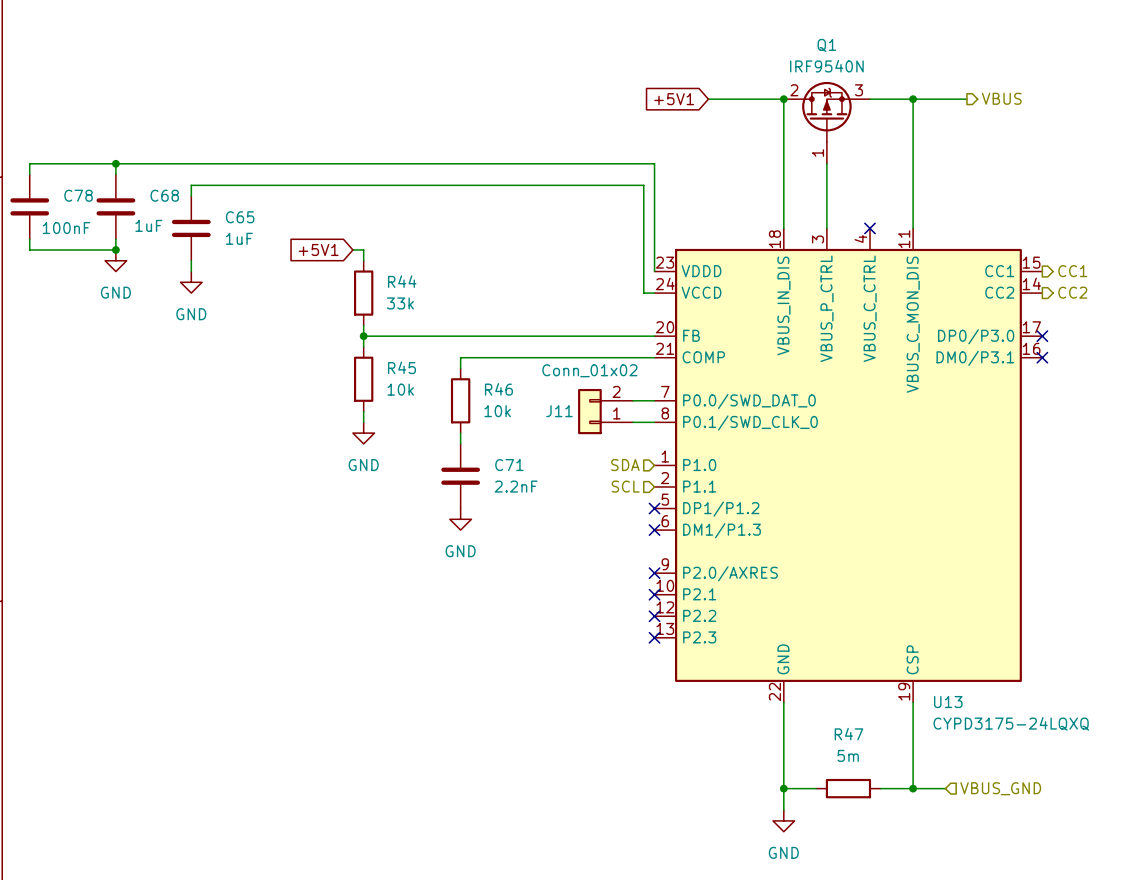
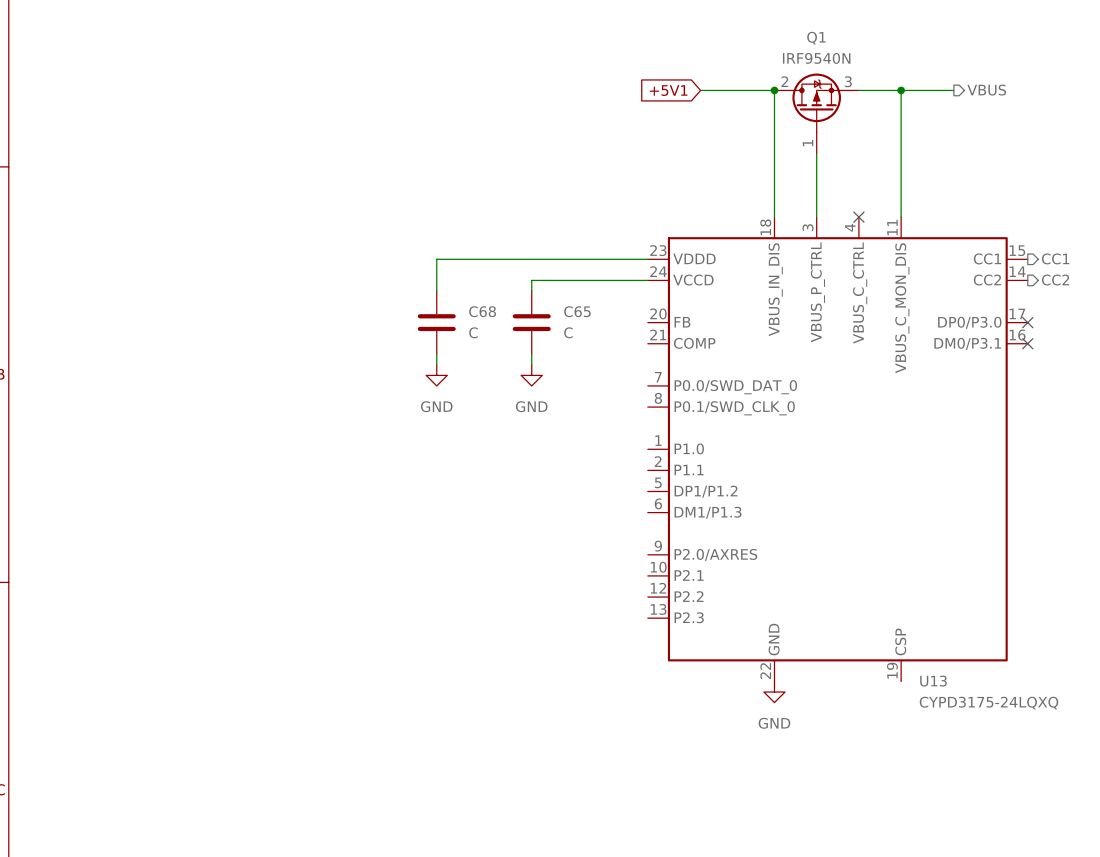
wire: (115, 163) (115, 174) -> none
junction: (115, 163) -> none
wire: (29, 174) (29, 163) (654, 163) (654, 271) -> (436, 290) (436, 259) (647, 259)
wire: (191, 196) (191, 185) (643, 185) (643, 293) -> (531, 290) (531, 280) (637, 280)
C78: 100nF (29, 206) -> none
C68 position: (115, 206) -> (436, 322)
C68 value: 1uF (148, 225) -> C (473, 332)
C65 position: (191, 228) -> (531, 322)
C65 value: 1uF (239, 238) -> C (568, 332)
wire: (29, 239) (29, 249) (115, 249) (115, 239) -> none
junction: (115, 249) -> none
global label: +5V1 (318, 249) -> none
wire: (352, 249) (363, 249) (363, 260) -> none
power symbol: GND (115, 260) -> none
wire: (191, 260) (191, 271) -> none
power symbol: GND (191, 282) -> none
R44: 33k (363, 293) -> none
wire: (363, 325) (363, 346) -> none
wire: (363, 336) (654, 336) -> none
junction: (363, 336) -> none
wire: (654, 357) (460, 357) (460, 368) -> none
R45: 10k (363, 379) -> none
power symbol: none -> GND (436, 375)
power symbol: none -> GND (531, 375)
R46: 10k (460, 400) -> none
wire: (632, 400) (654, 400) -> none
wire: (363, 411) (363, 422) -> (531, 354) (531, 364)
J11: Conn_01x02 (605, 411) -> none
wire: (632, 422) (654, 422) -> none
power symbol: GND (363, 433) -> none
wire: (460, 433) (460, 443) -> (436, 354) (436, 364)
hierarchical label: SDA (625, 465) -> none
C71: 2.2nF (460, 476) -> none
hierarchical label: SCL (625, 486) -> none
no-connect mark: (654, 508) -> none
power symbol: GND (460, 519) -> none
no-connect mark: (654, 530) -> none
no-connect mark: (654, 573) -> none
no-connect mark: (654, 594) -> none
no-connect mark: (654, 616) -> none
no-connect mark: (654, 637) -> none
wire: (783, 702) (783, 810) -> none
wire: (913, 702) (913, 788) -> none
wire: (783, 788) (816, 788) -> none
junction: (783, 788) -> none
R47: 5m (848, 788) -> none
wire: (880, 788) (945, 788) -> none
junction: (913, 788) -> none
hierarchical label: VBUS_GND (1000, 788) -> none
power symbol position: GND (783, 820) -> GND (774, 692)

